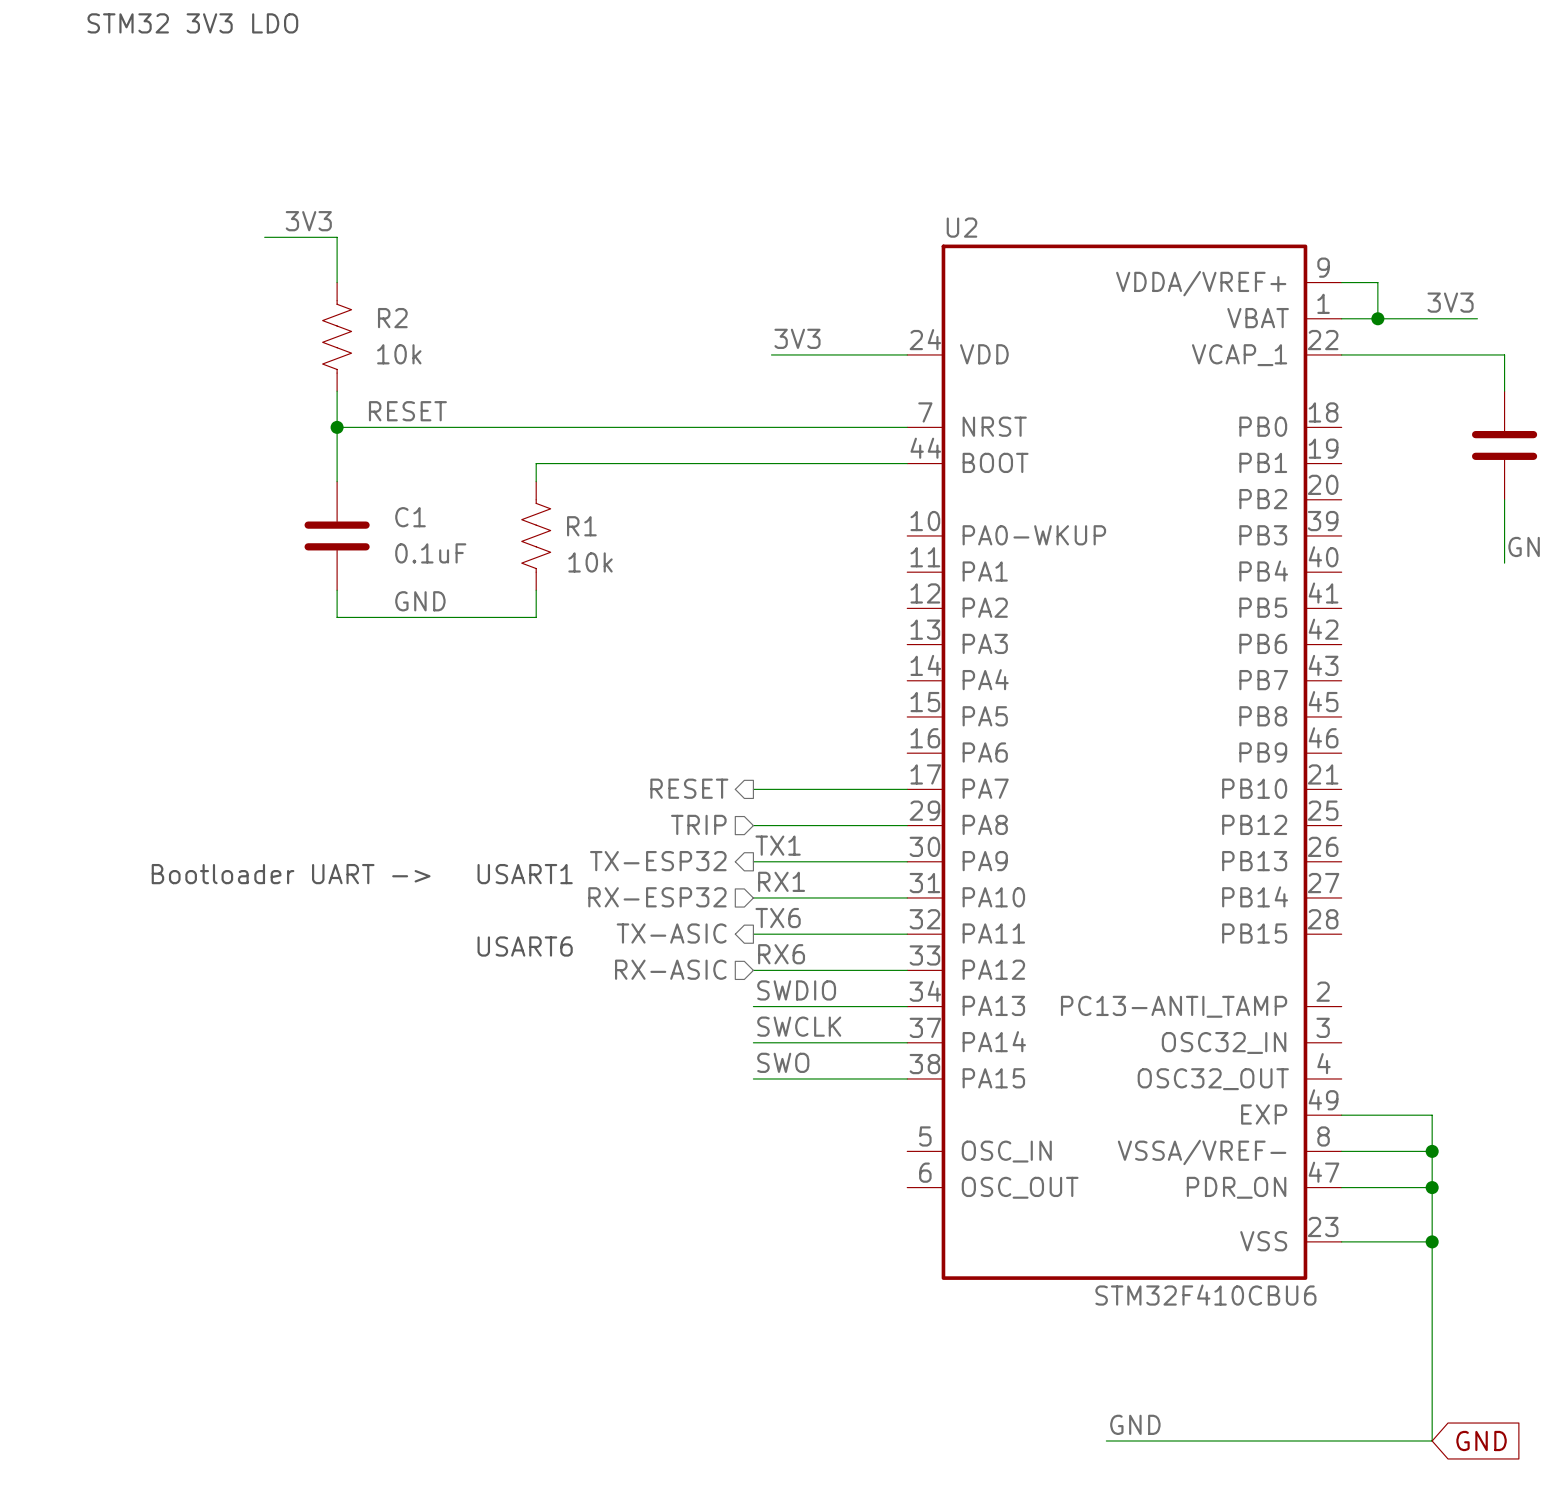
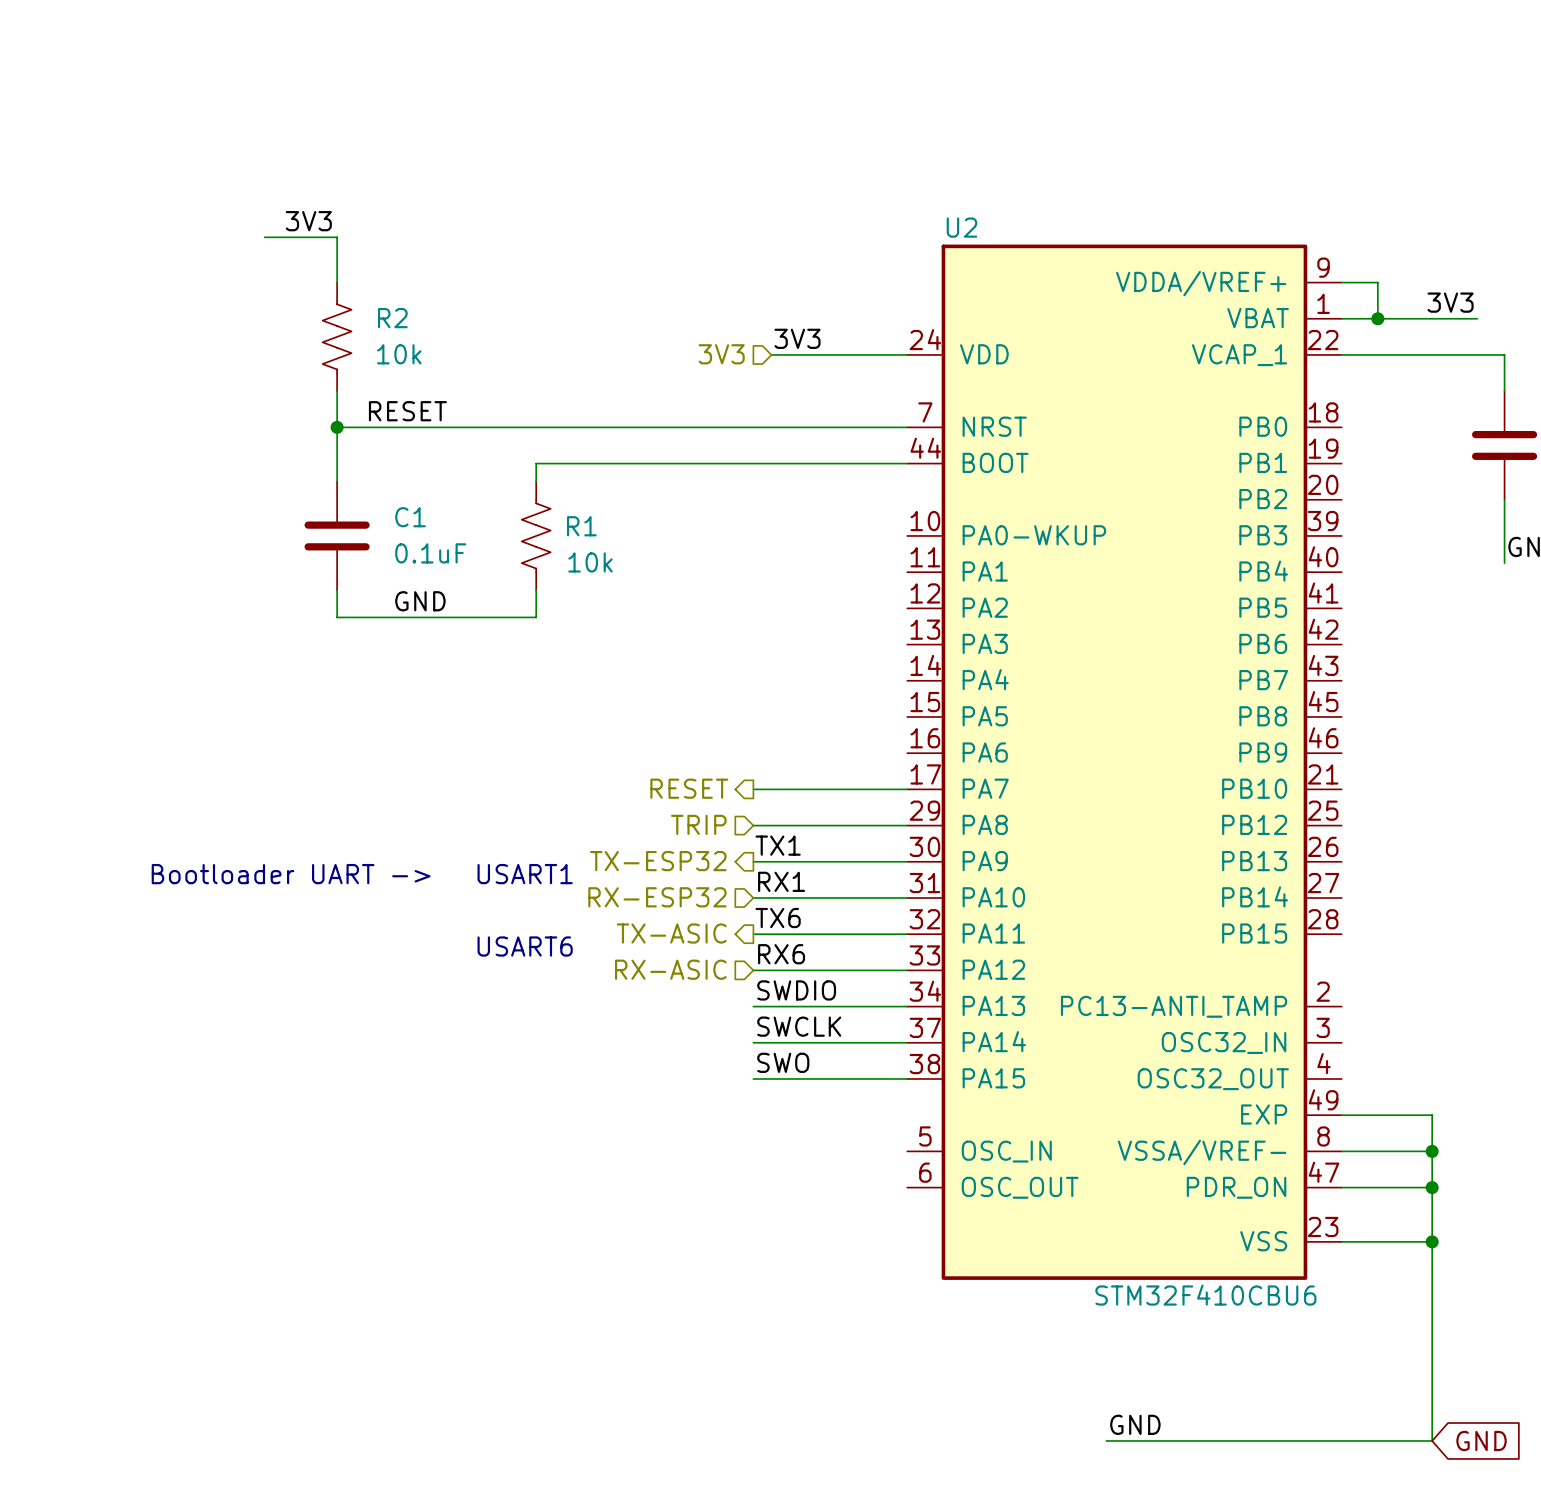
text: STM32 3V3 LDO (192, 23) -> none
hierarchical label: none -> 3V3 (721, 354)

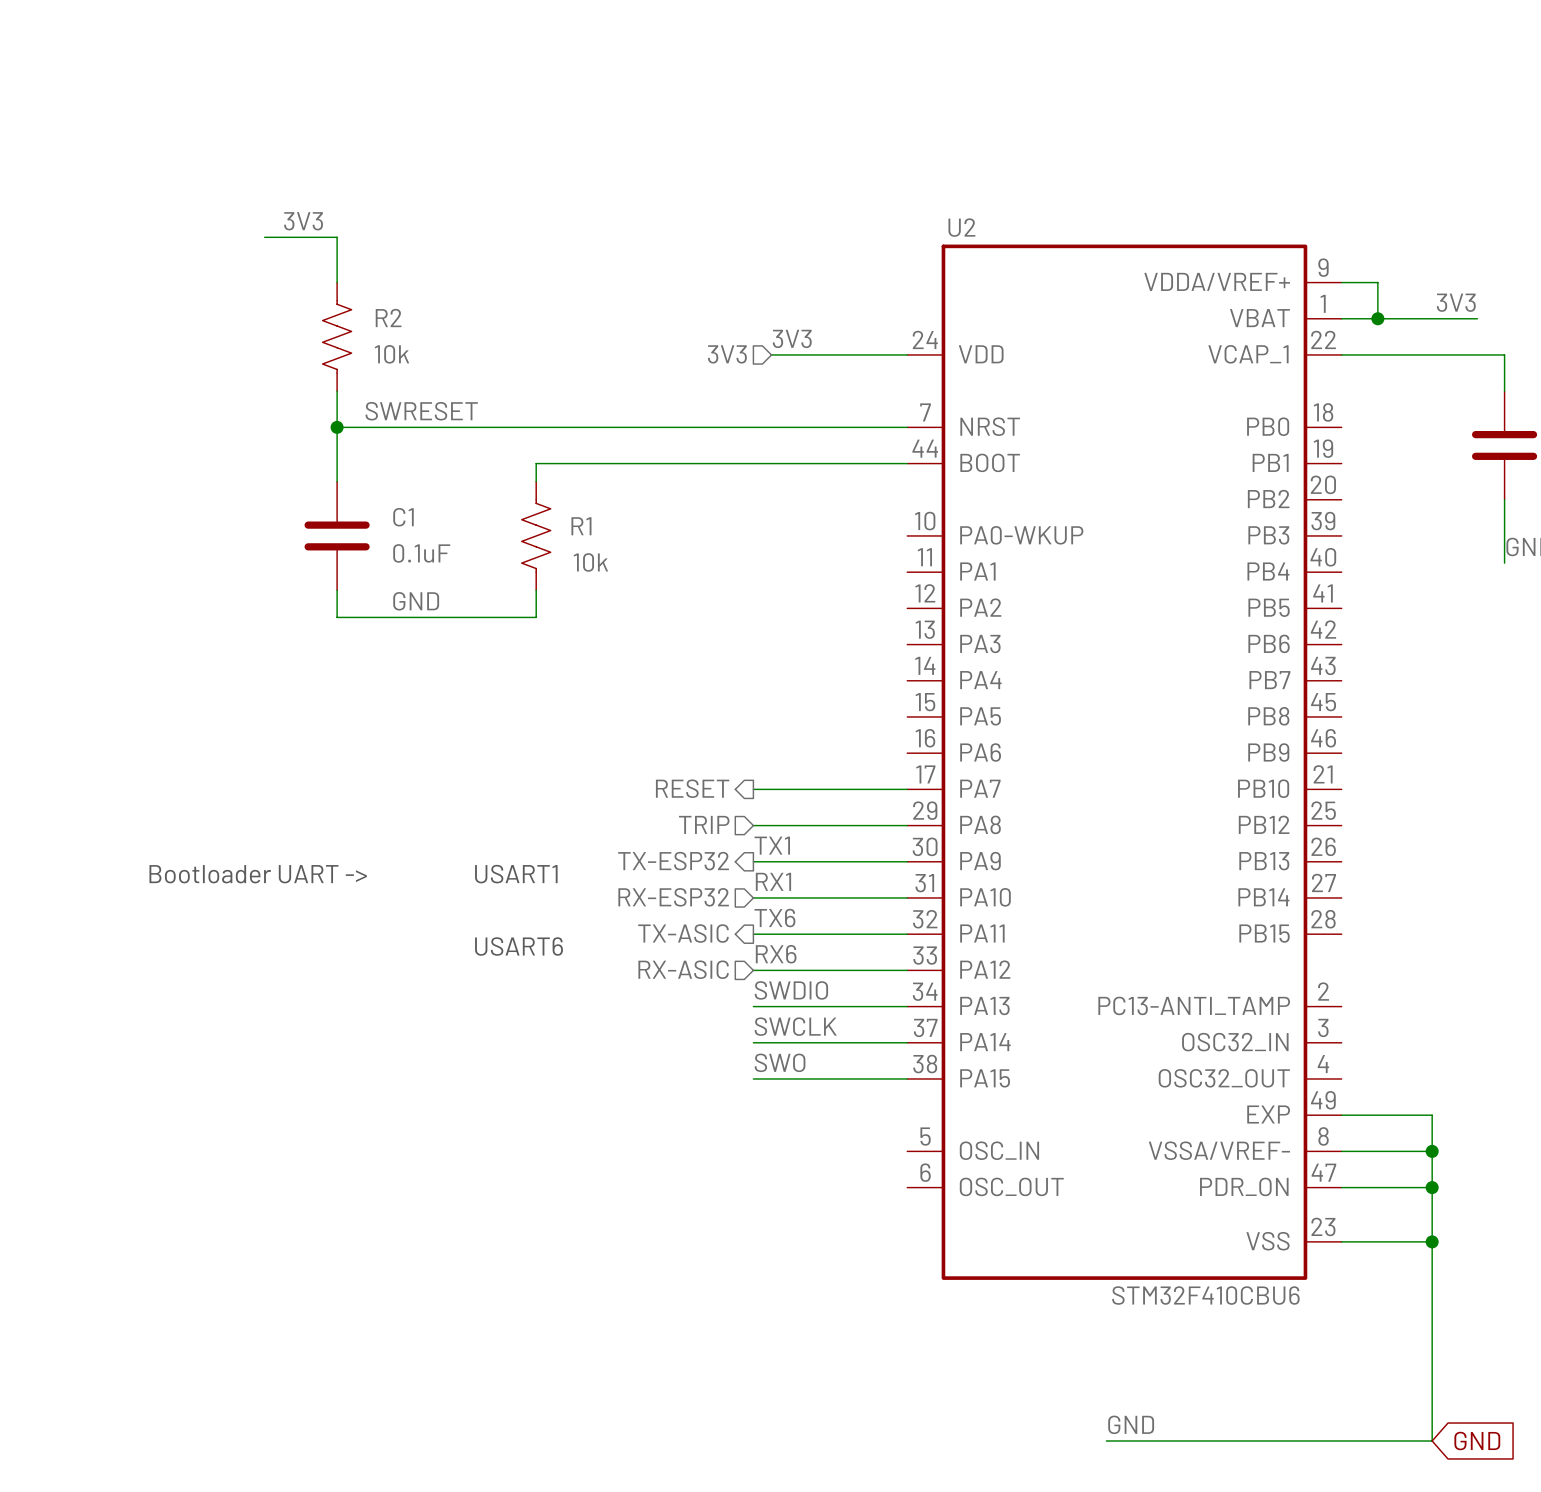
label: RESET (407, 411) -> SWRESET (421, 411)

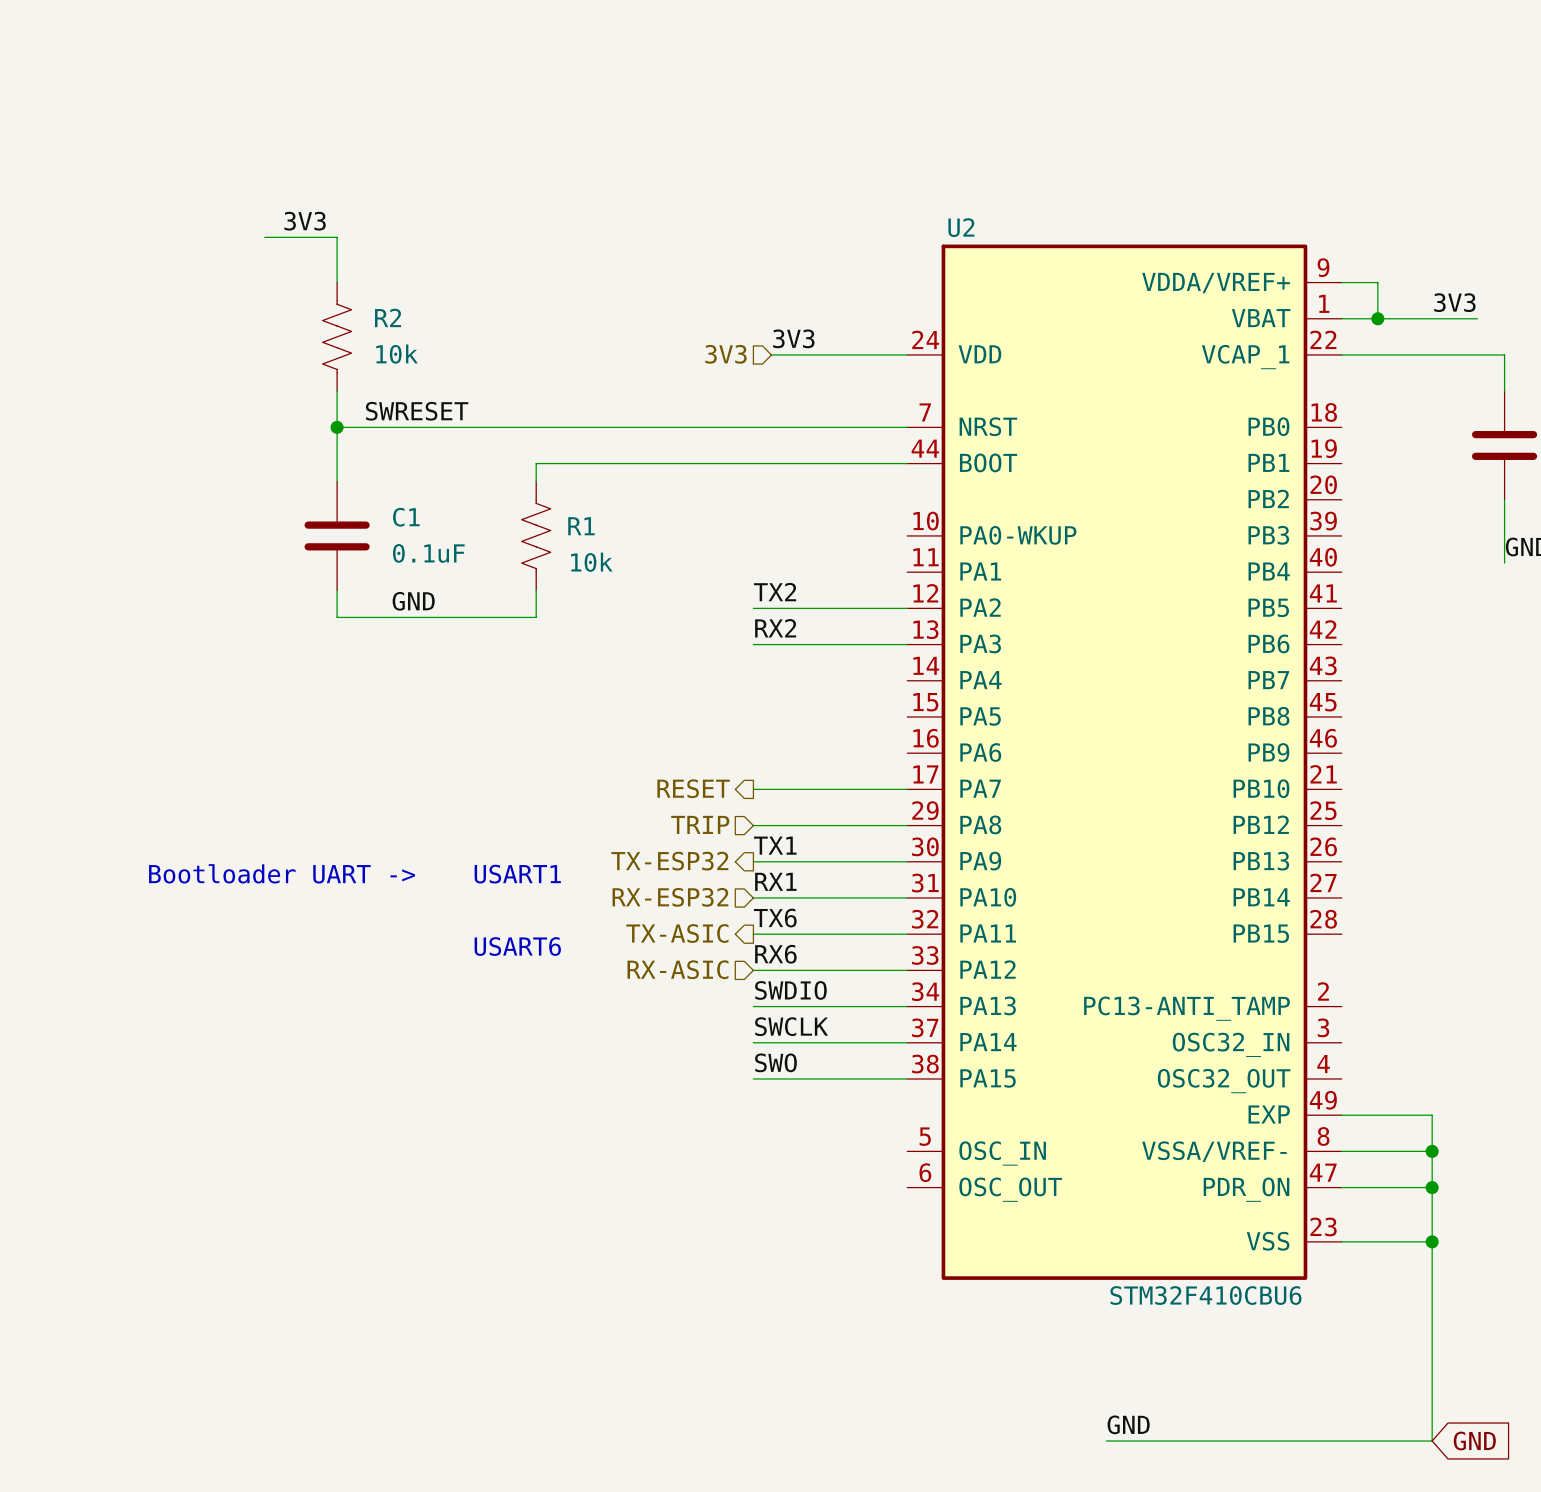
label: none -> TX2 (775, 592)
wire: none -> (753, 608) (907, 608)
label: none -> RX2 (775, 628)
wire: none -> (753, 644) (907, 644)

